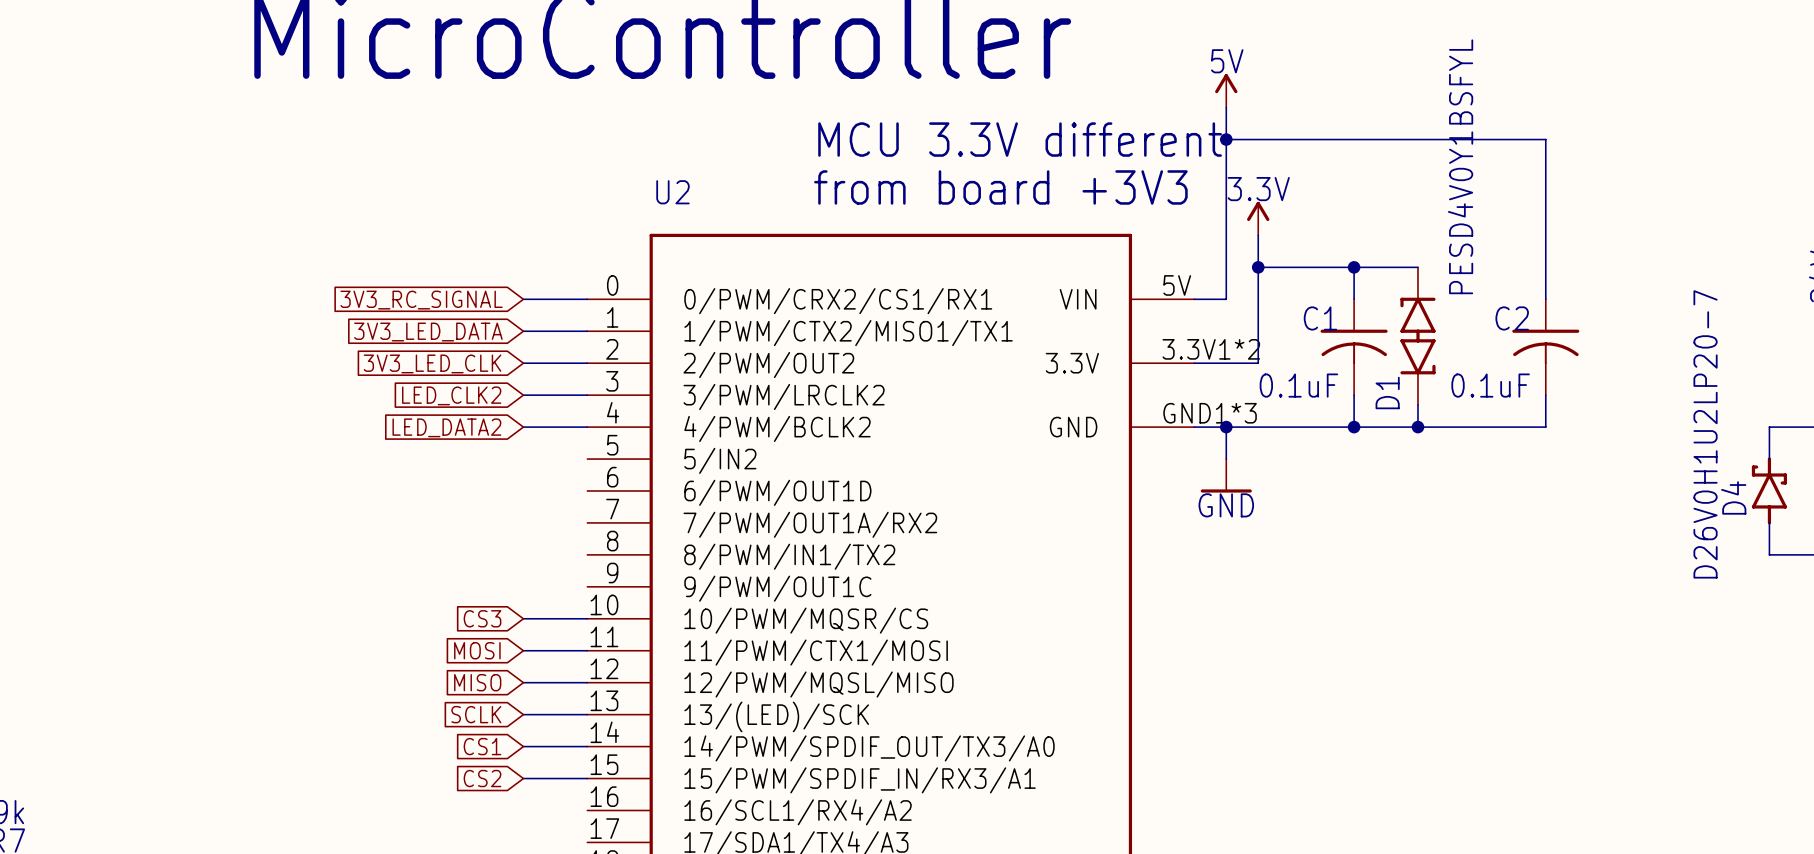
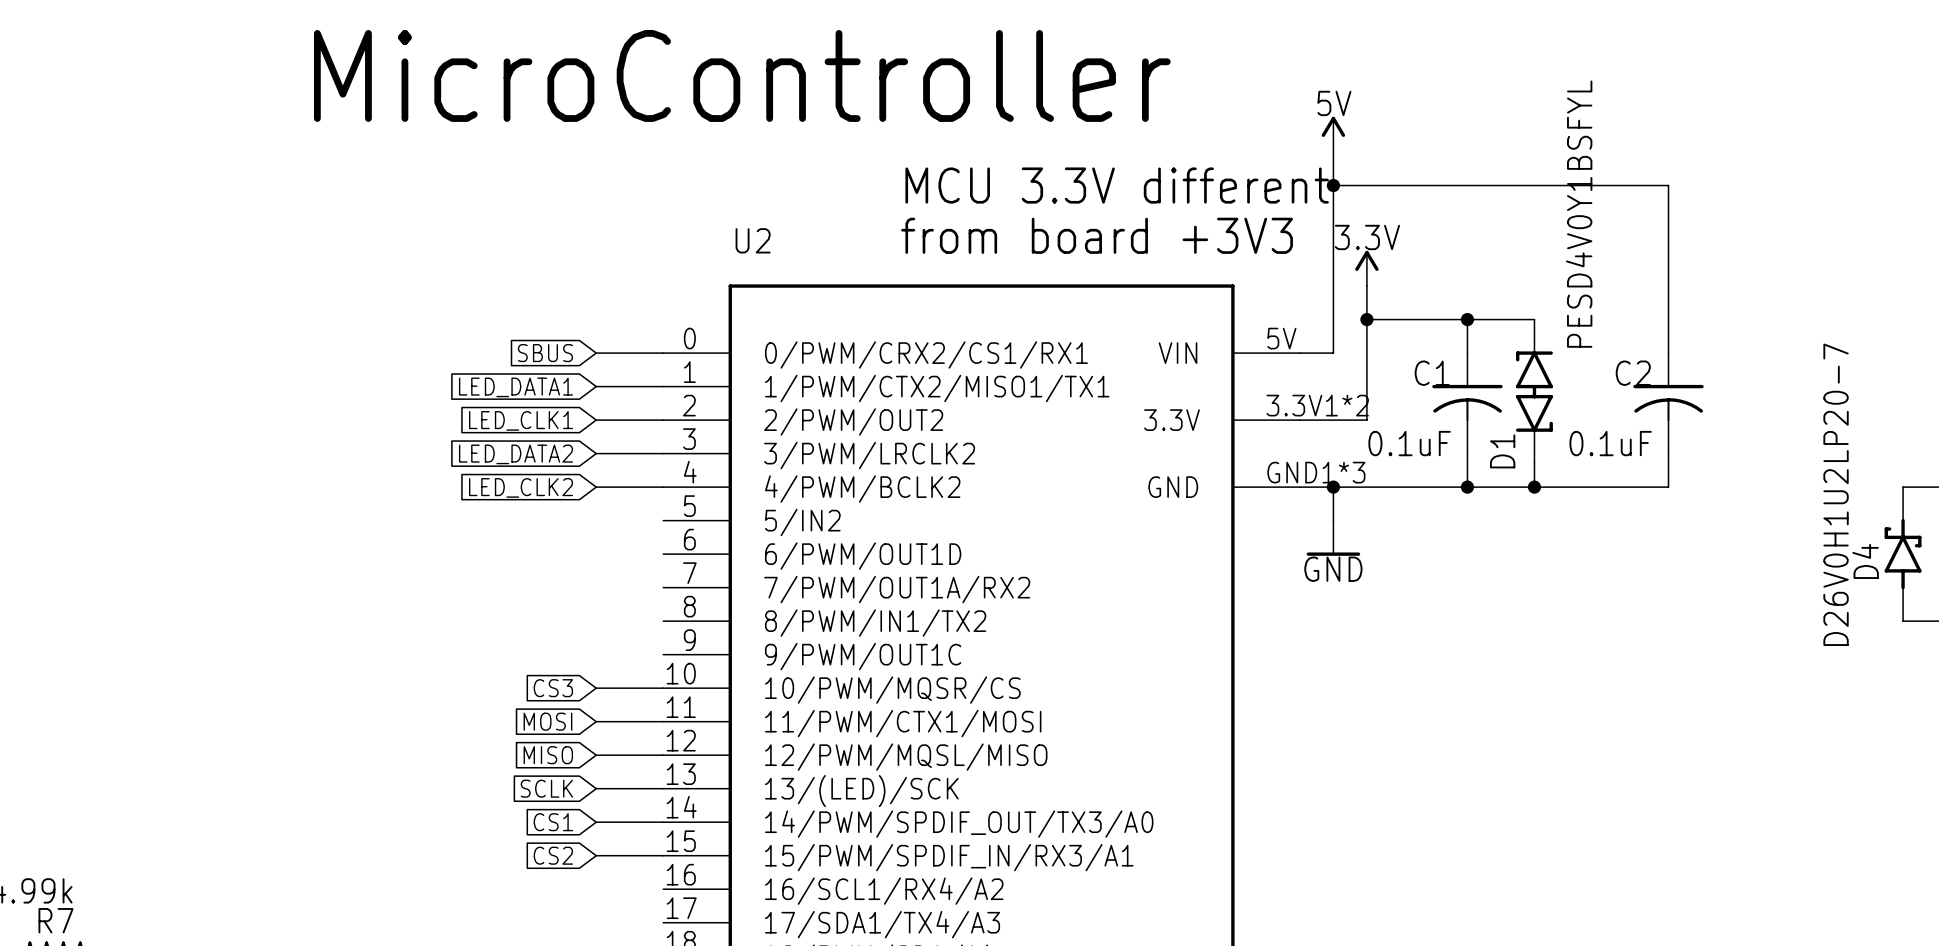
global label: 3V3_RC_SIGNAL (421, 300) -> SBUS (545, 353)
global label: 3V3_LED_DATA (428, 332) -> LED_DATA1 (516, 387)
global label: 3V3_LED_CLK (432, 363) -> LED_CLK1 (521, 420)
global label: LED_CLK2 (451, 395) -> LED_DATA2 (516, 454)
global label: LED_DATA2 (446, 427) -> LED_CLK2 (521, 487)

